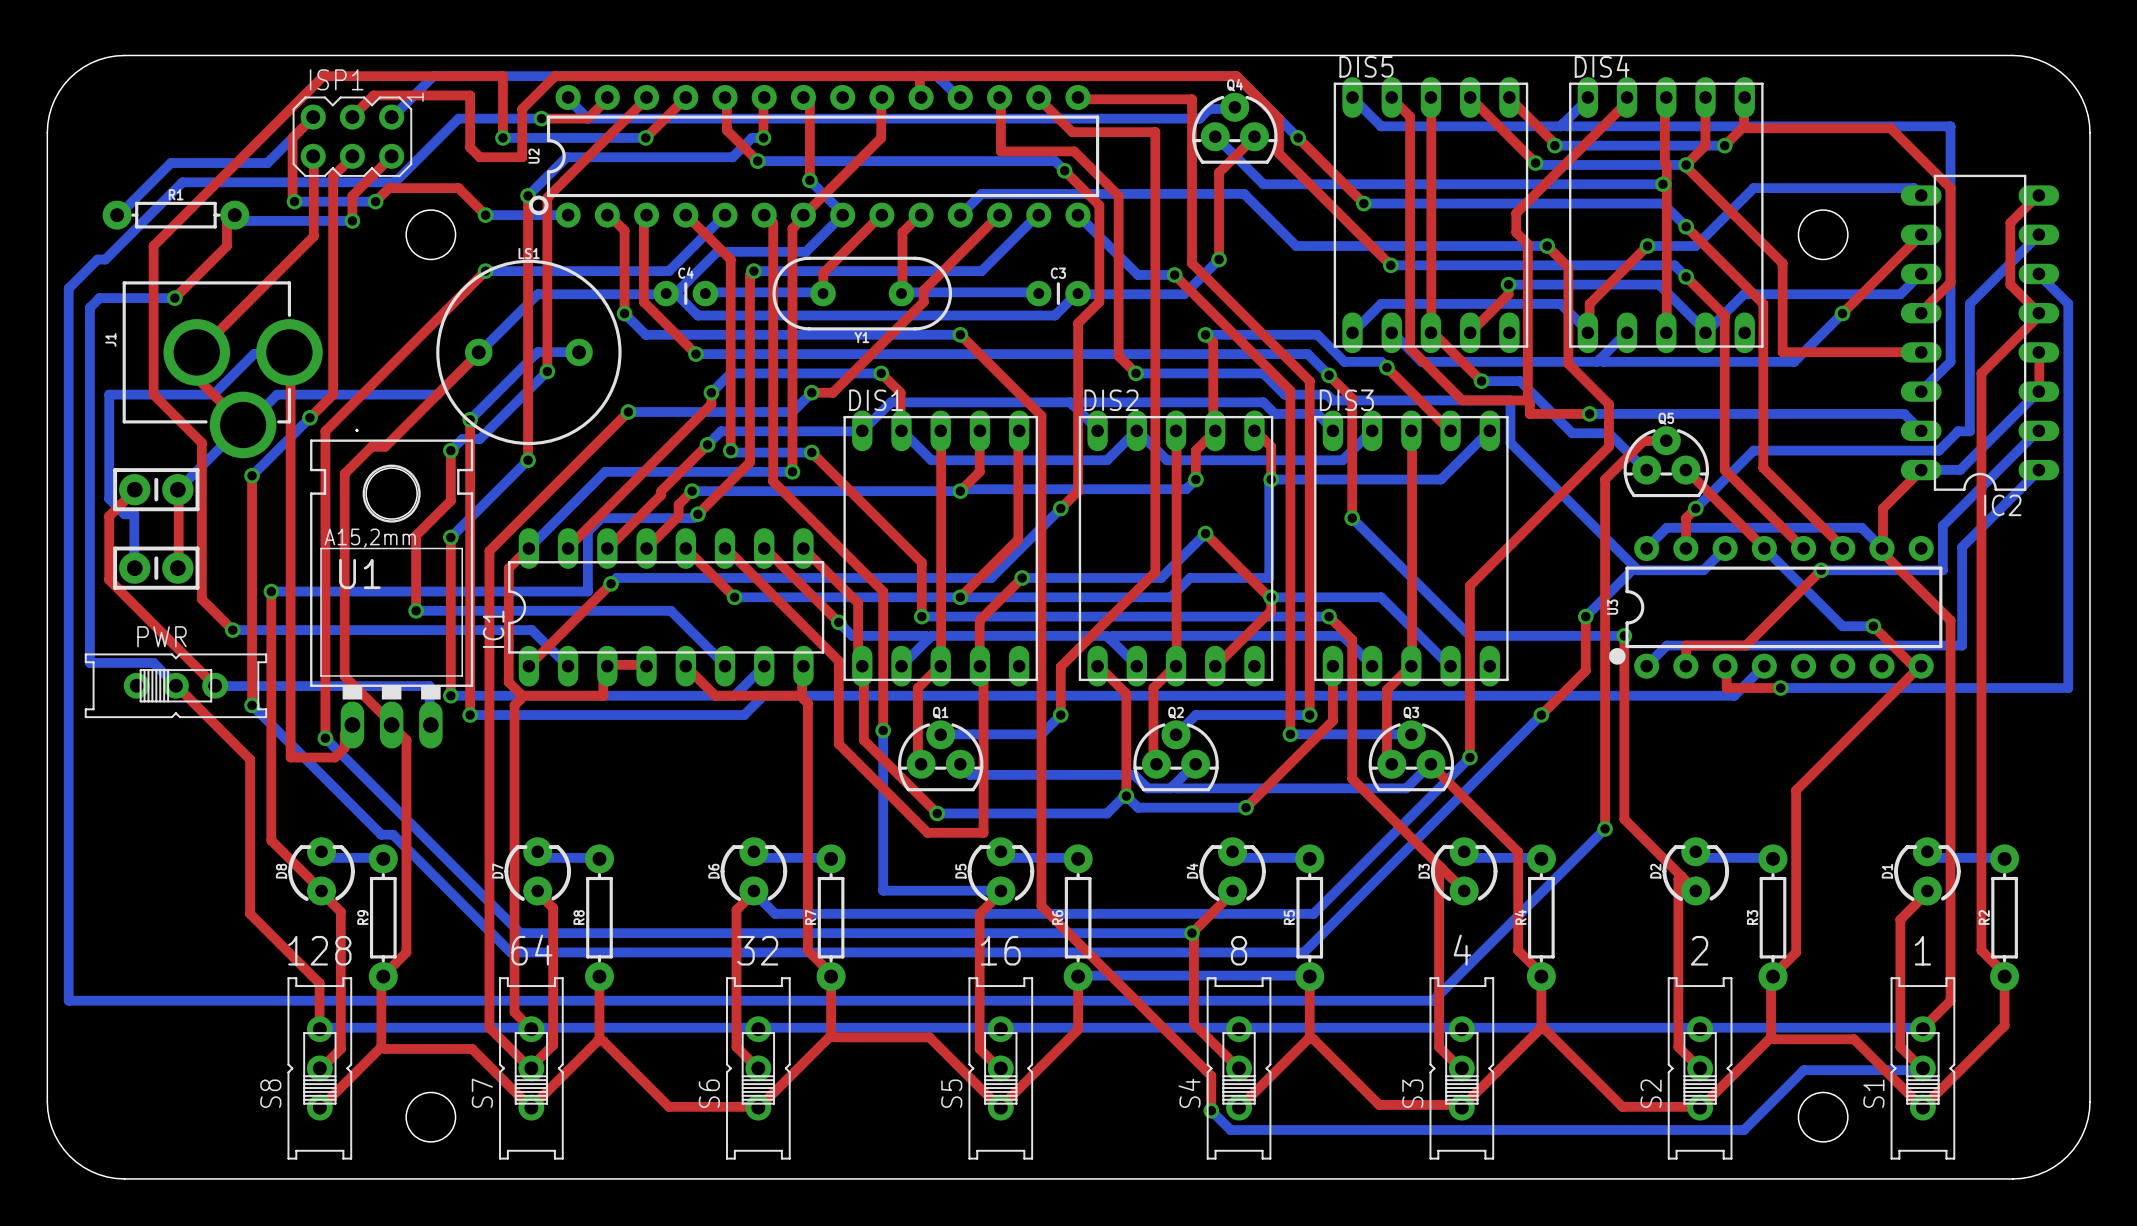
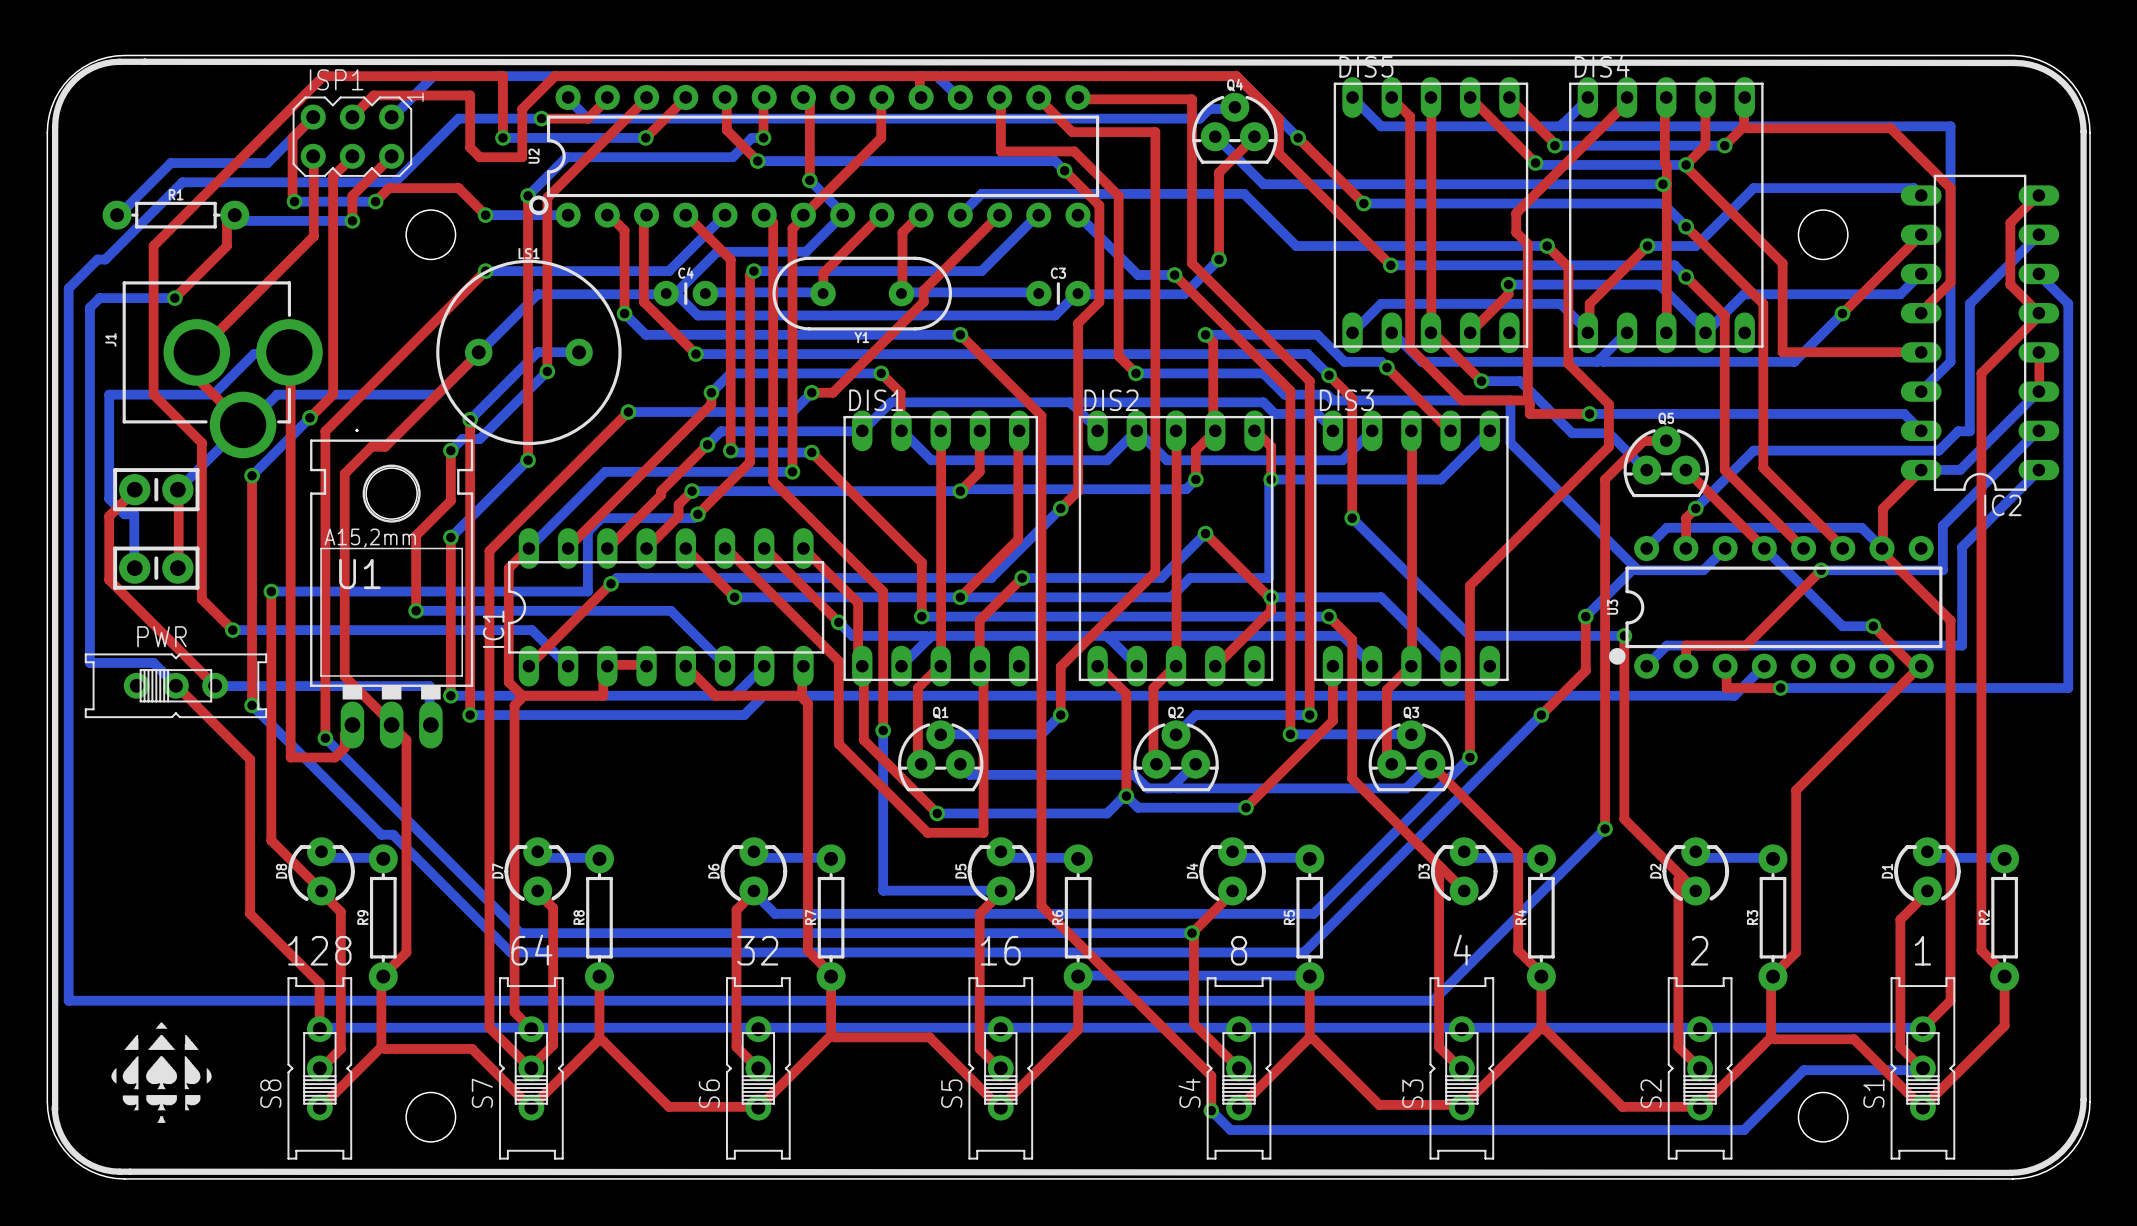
line: none -> (144, 61) (2014, 62) (2030, 64) (2044, 69) (2063, 83) (2073, 95) (2081, 116) (2083, 131) (2083, 1107) (2076, 1131) (2067, 1145) (2055, 1156) (2034, 1168) (2010, 1172) (119, 1171) (98, 1168) (85, 1161) (73, 1152) (64, 1141) (58, 1128) (54, 1106)
line: none -> (145, 61) (112, 62) (98, 65) (85, 71) (74, 80) (65, 92) (58, 105) (55, 119) (54, 1109)
drawing: none -> [111, 1022, 212, 1123]

